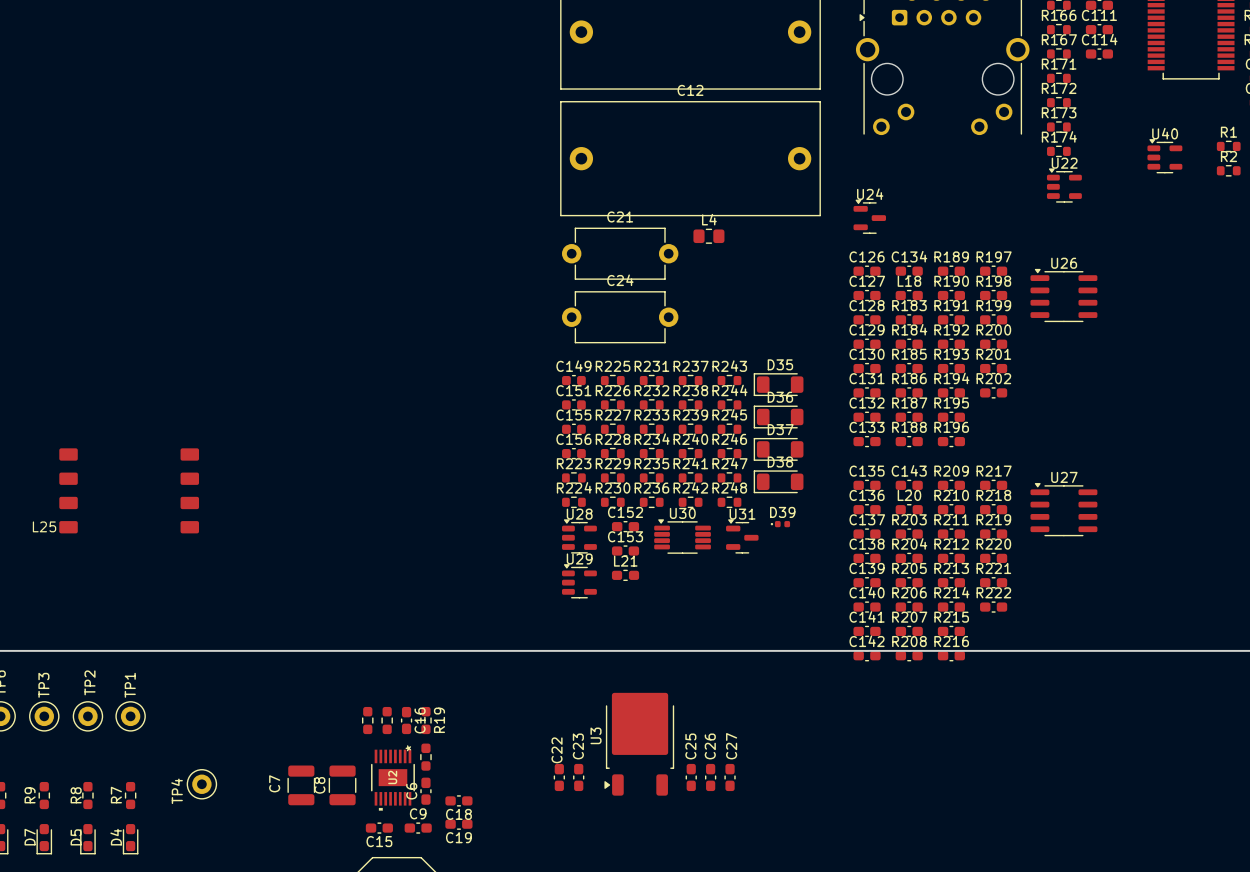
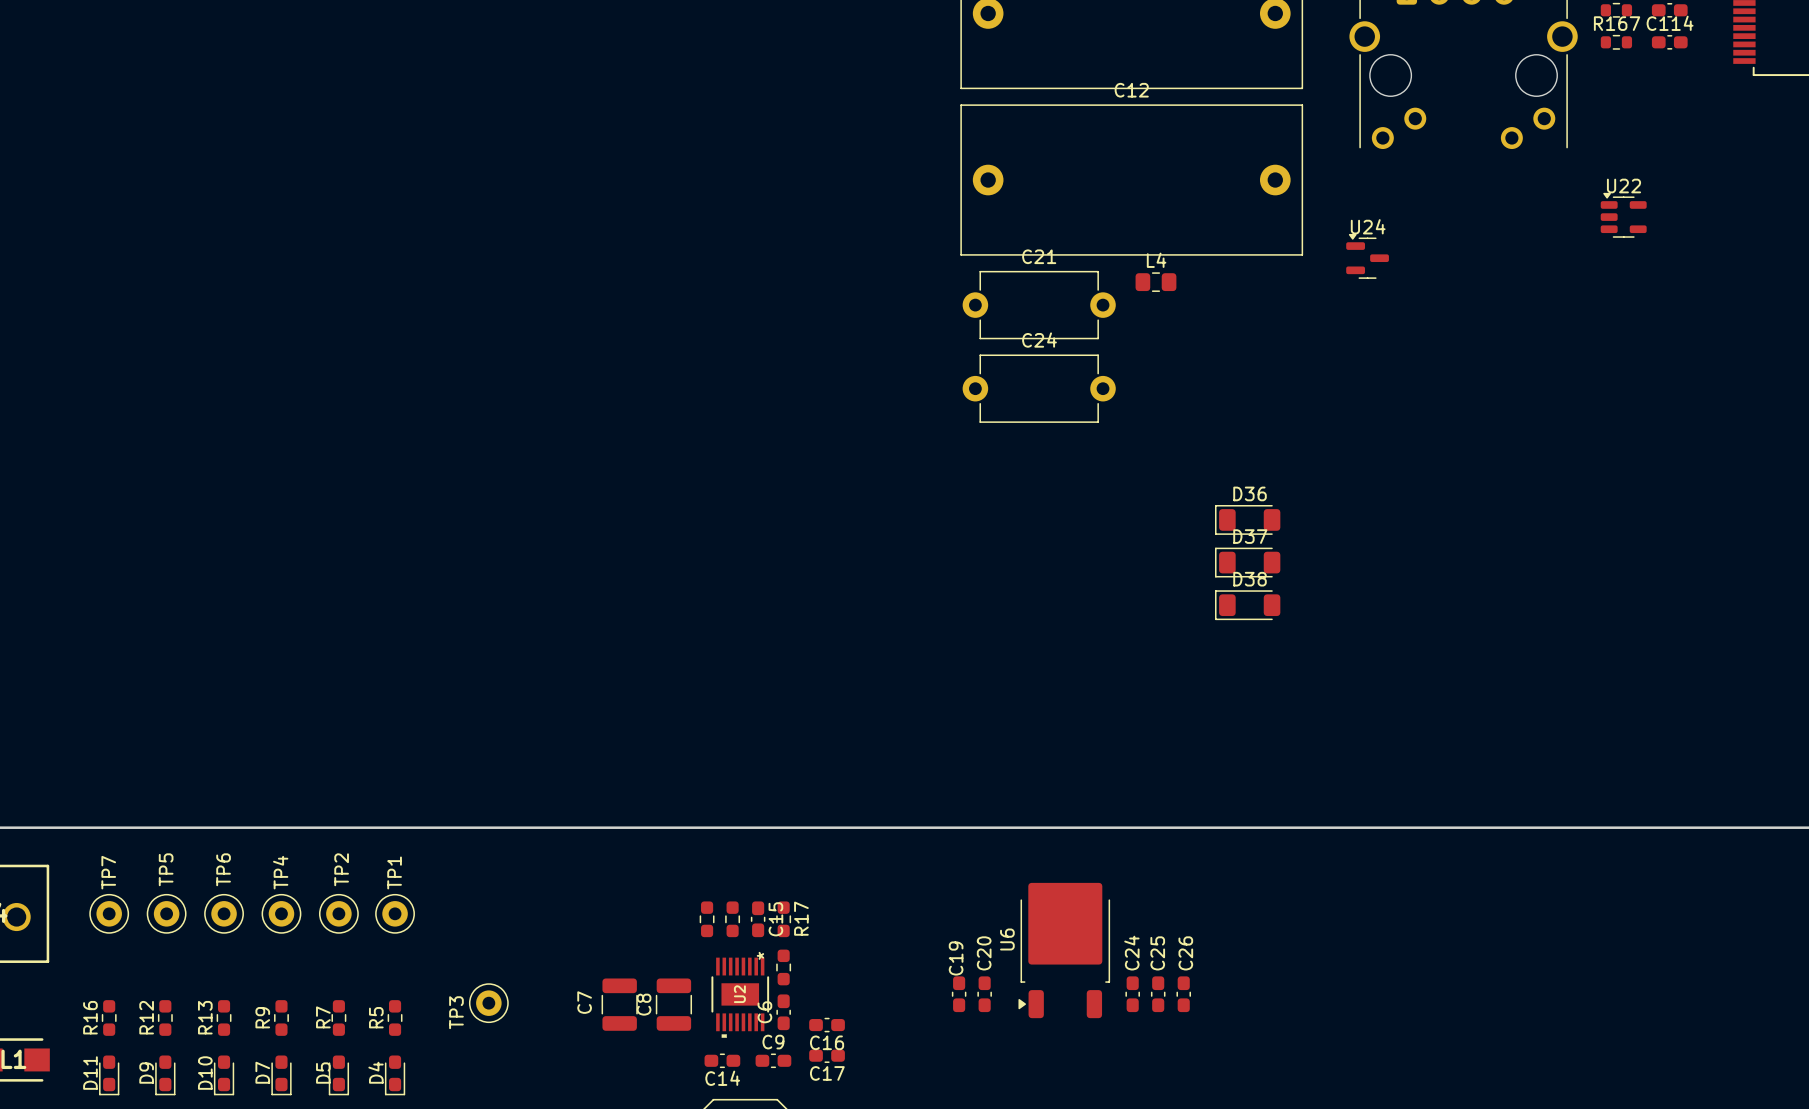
R171: (1058, 78) -> none
R172: (1058, 102) -> none
R173: (1058, 127) -> none
R174: (1058, 151) -> none
U40: (1164, 156) -> none
C126: (867, 271) -> none
C134: (909, 271) -> none
R189: (951, 271) -> none
R197: (993, 271) -> none
C127: (867, 295) -> none
L18: (909, 295) -> none
R190: (951, 295) -> none
R198: (993, 295) -> none
U26: (1063, 295) -> none
C128: (867, 319) -> none
R183: (909, 319) -> none
R191: (951, 319) -> none
R199: (993, 319) -> none
C129: (867, 344) -> none
R184: (909, 344) -> none
R192: (951, 344) -> none
R200: (993, 344) -> none
C130: (867, 368) -> none
R185: (909, 368) -> none
R193: (951, 368) -> none
R201: (993, 368) -> none
C149: (573, 380) -> none
R225: (612, 380) -> none
R231: (651, 380) -> none
R237: (690, 380) -> none
R243: (729, 380) -> none
D35: (778, 384) -> none
C131: (867, 392) -> none
R186: (909, 392) -> none
R194: (951, 392) -> none
R202: (993, 392) -> none
C151: (573, 404) -> none
R226: (612, 404) -> none
R232: (651, 404) -> none
R238: (690, 404) -> none
R244: (729, 404) -> none
C132: (867, 417) -> none
R187: (909, 417) -> none
R195: (951, 417) -> none
C155: (573, 429) -> none
R227: (612, 429) -> none
R233: (651, 429) -> none
R239: (690, 429) -> none
R245: (729, 429) -> none
C133: (867, 441) -> none
R188: (909, 441) -> none
R196: (951, 441) -> none
C156: (573, 453) -> none
R228: (612, 453) -> none
R234: (651, 453) -> none
R240: (690, 453) -> none
R246: (729, 453) -> none
R223: (573, 477) -> none
R229: (612, 477) -> none
R235: (651, 477) -> none
R241: (690, 477) -> none
R247: (729, 477) -> none
C135: (867, 485) -> none
C143: (909, 485) -> none
R209: (951, 485) -> none
R217: (993, 485) -> none
L25: (129, 490) -> none
R224: (573, 502) -> none
R230: (612, 502) -> none
R236: (651, 502) -> none
R242: (690, 502) -> none
R248: (729, 502) -> none
C136: (867, 509) -> none
L20: (909, 509) -> none
R210: (951, 509) -> none
R218: (993, 509) -> none
U27: (1063, 509) -> none
D39: (780, 524) -> none
C152: (625, 526) -> none
C137: (867, 534) -> none
R203: (909, 534) -> none
R211: (951, 534) -> none
R219: (993, 534) -> none
U28: (579, 536) -> none
U30: (682, 536) -> none
U31: (742, 536) -> none
C153: (625, 551) -> none
C138: (867, 558) -> none
R204: (909, 558) -> none
R212: (951, 558) -> none
R220: (993, 558) -> none
L21: (625, 575) -> none
U29: (579, 581) -> none
C139: (867, 582) -> none
R205: (909, 582) -> none
R213: (951, 582) -> none
R221: (993, 582) -> none
C140: (867, 607) -> none
R206: (909, 607) -> none
R214: (951, 607) -> none
R222: (993, 607) -> none
C141: (867, 631) -> none
R207: (909, 631) -> none
R215: (951, 631) -> none
C142: (867, 655) -> none
R208: (909, 655) -> none
R216: (951, 655) -> none
TP3 name: TP3 (43, 685) -> TP4 (280, 872)
C16 name: C16 (420, 720) -> C15 (775, 919)
R19 name: R19 (439, 720) -> R17 (801, 918)
U3 name: U3 (596, 735) -> U6 (1007, 939)
C23 name: C23 (578, 746) -> C20 (984, 953)
C25 name: C25 (690, 746) -> C24 (1131, 953)
C26 name: C26 (710, 746) -> C25 (1157, 953)
C27 name: C27 (731, 746) -> C26 (1185, 953)
C22 name: C22 (557, 750) -> C19 (956, 958)
TP4 name: TP4 (177, 791) -> TP3 (456, 1012)
R8 name: R8 (76, 795) -> R7 (323, 1017)
R7 name: R7 (116, 795) -> R5 (376, 1017)
C18 name: C18 (458, 814) -> C16 (827, 1042)
C19 name: C19 (458, 837) -> C17 (827, 1073)
C15 name: C15 (379, 841) -> C14 (722, 1078)

